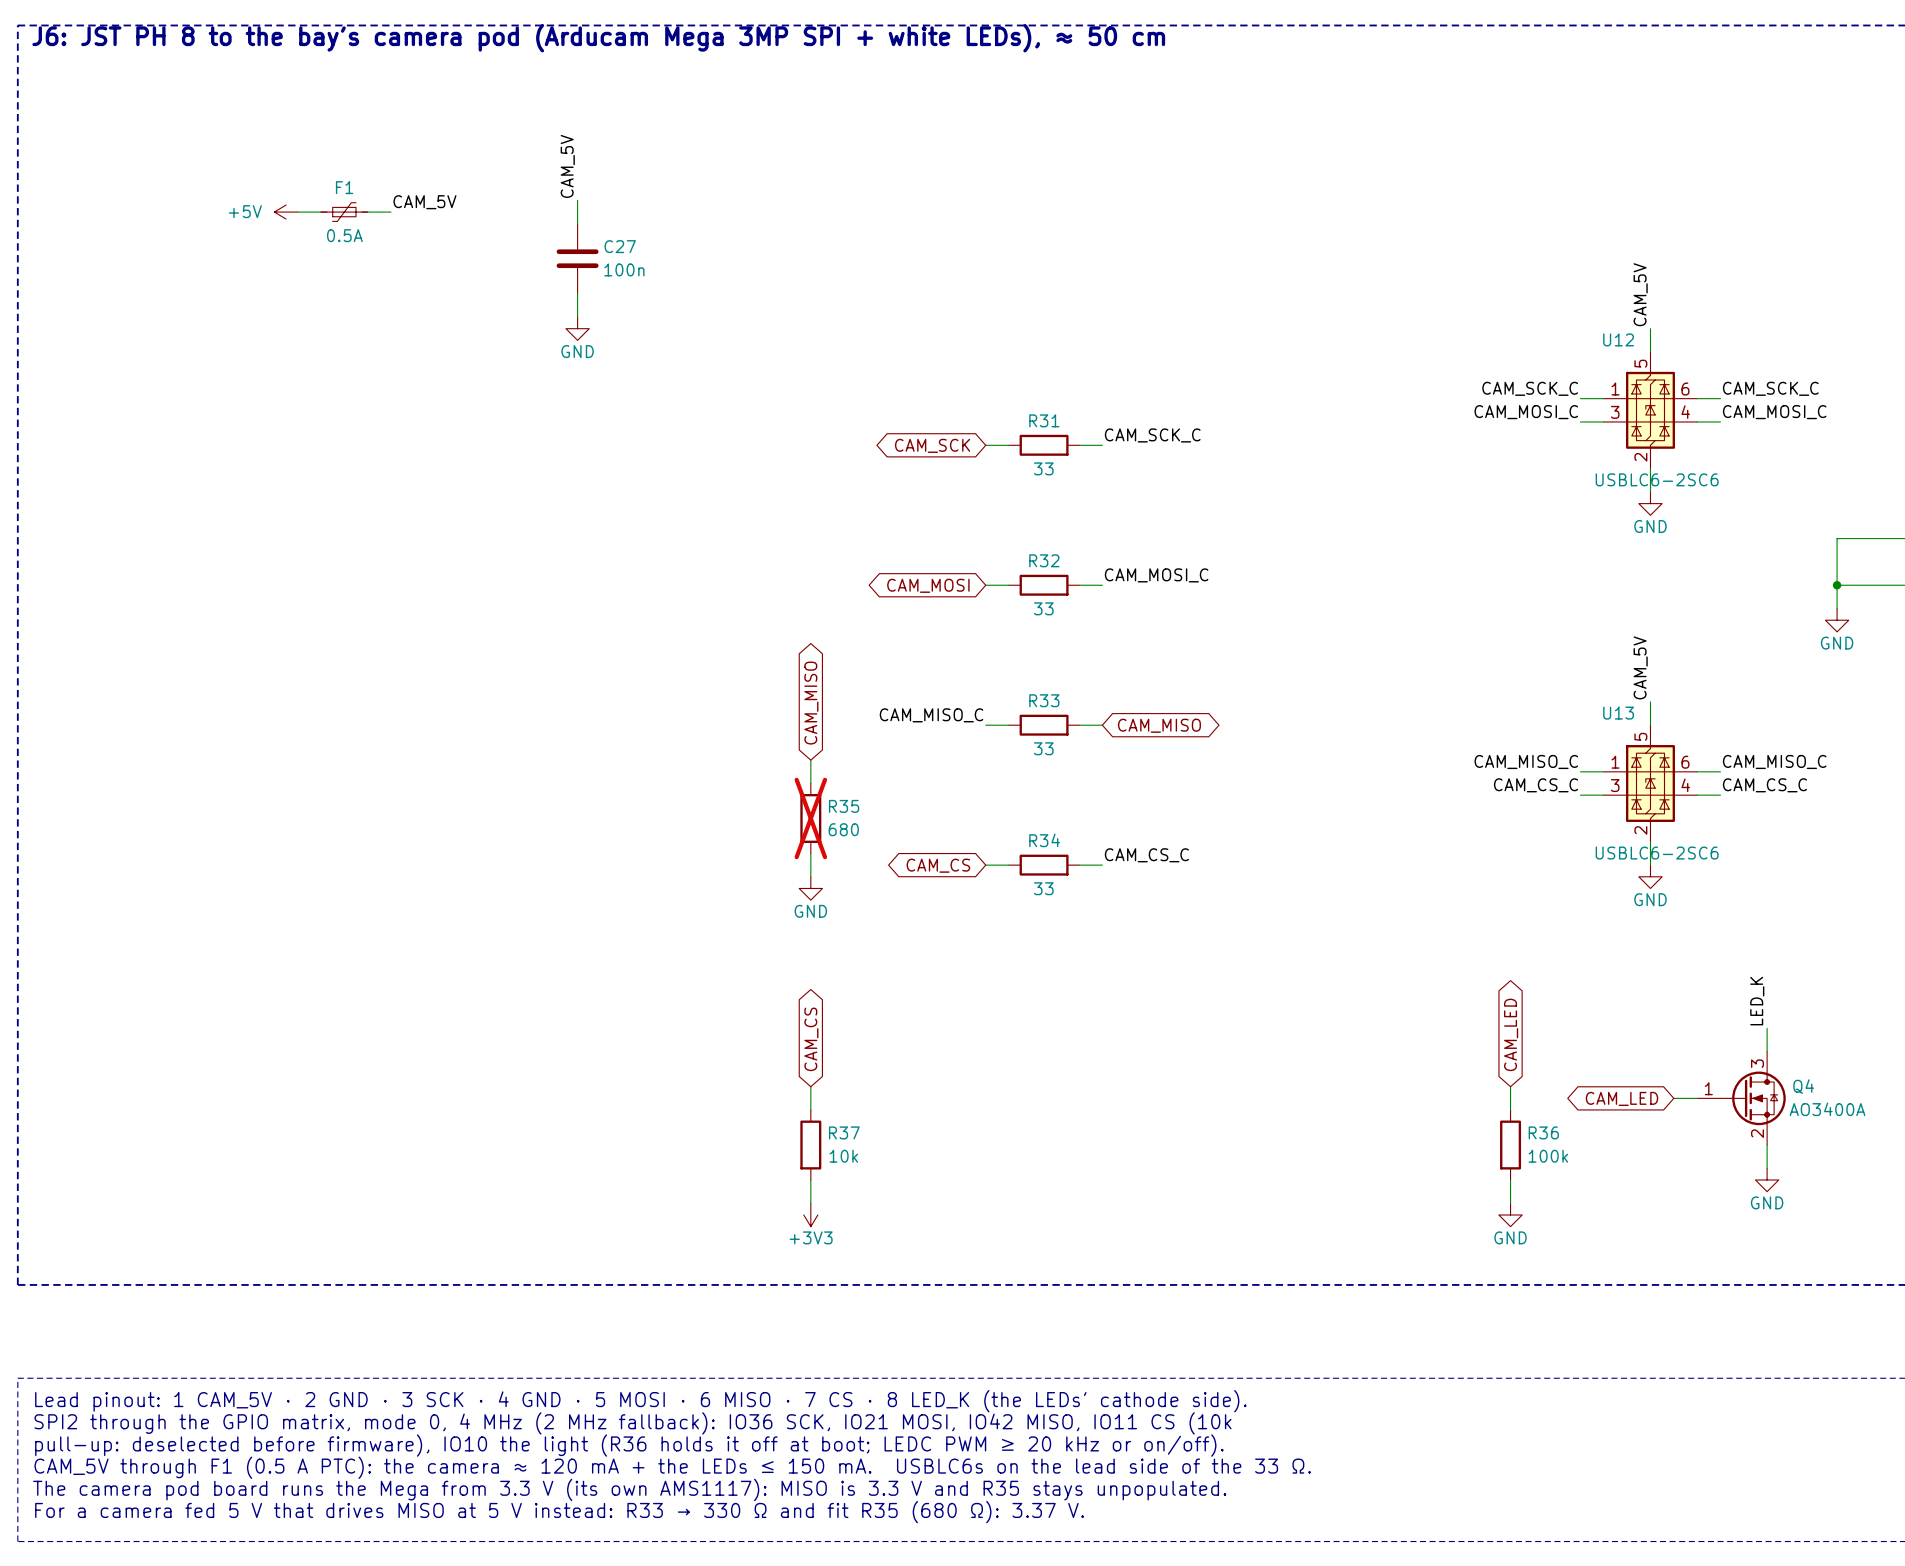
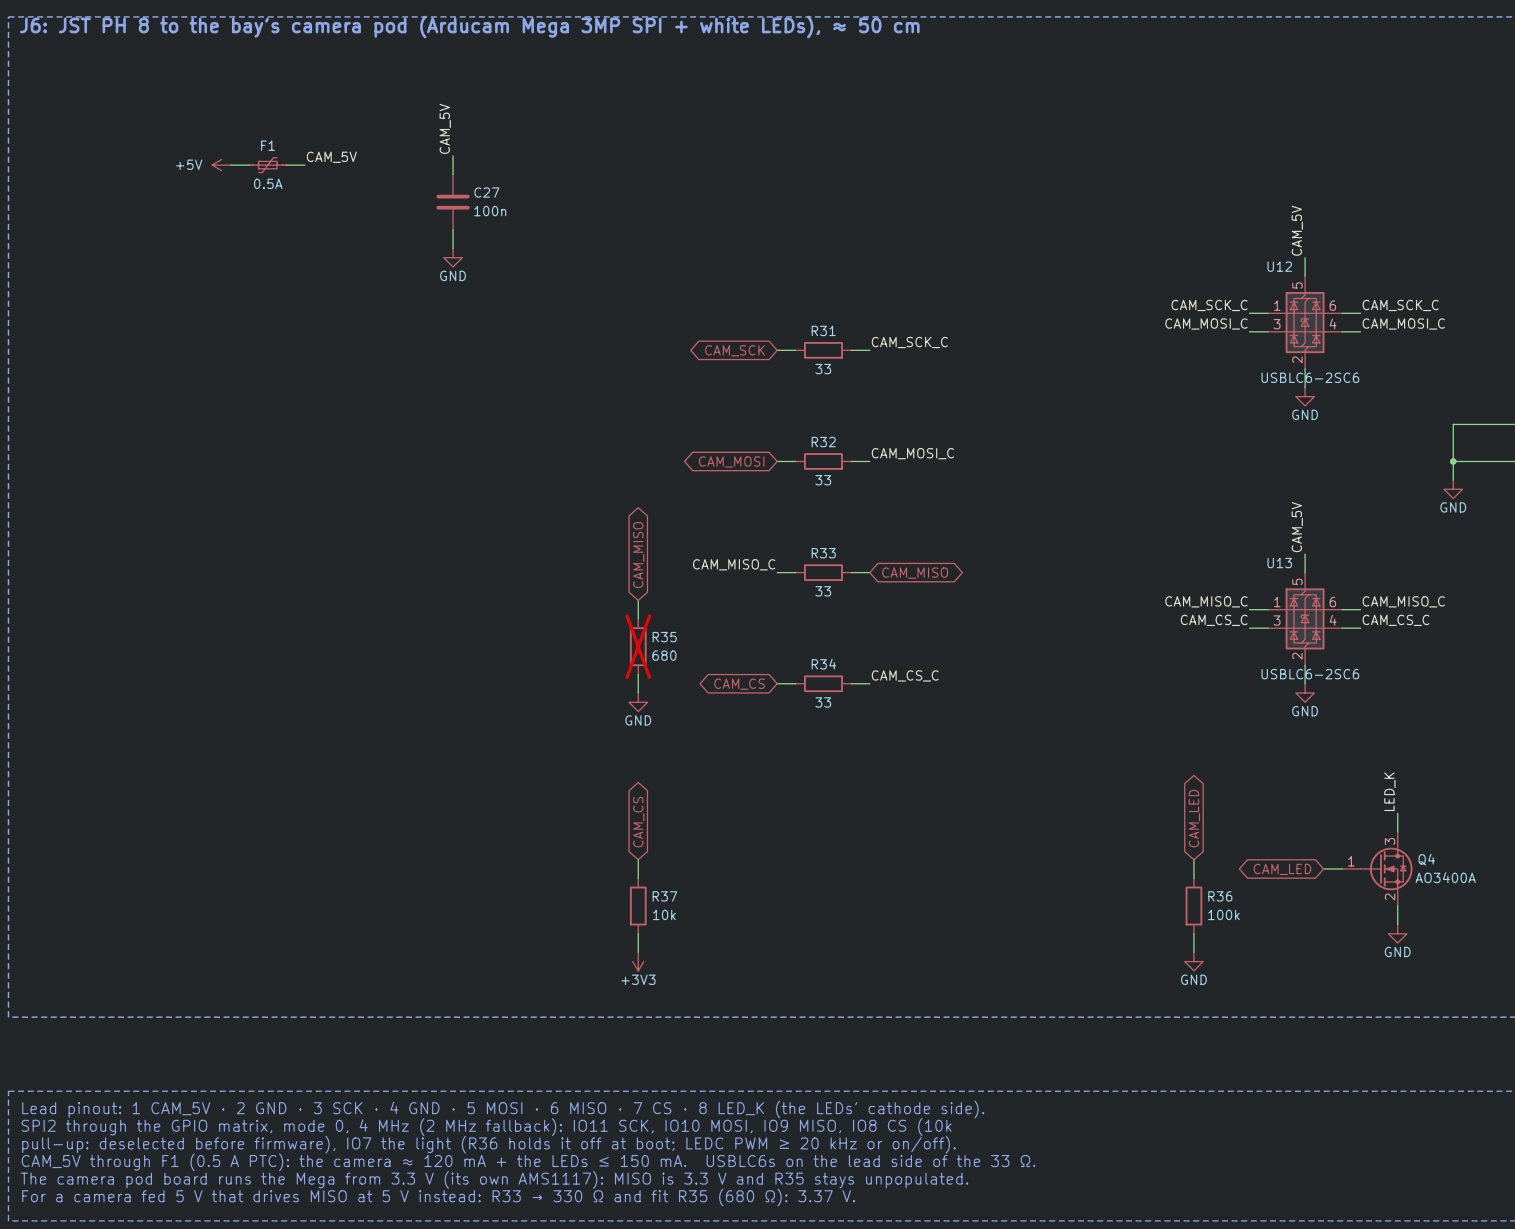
text: SPI2 through the GPIO matrix, mode 0, 4 MHz (2 MHz fallback): IO36 SCK, IO21 MOSI, IO42 MISO, IO11 CS (10k (632, 1423) -> SPI2 through the GPIO matrix, mode 0, 4 MHz (2 MHz fallback): IO11 SCK, IO10 MOSI, IO9 MISO, IO8 CS (10k (486, 1127)
text: pull-up: deselected before firmware), IO10 the light (R36 holds it off at boot; LEDC PWM ≥ 20 kHz or on/off). (629, 1445) -> pull-up: deselected before firmware), IO7 the light (R36 holds it off at boot; LEDC PWM ≥ 20 kHz or on/off). (488, 1144)

